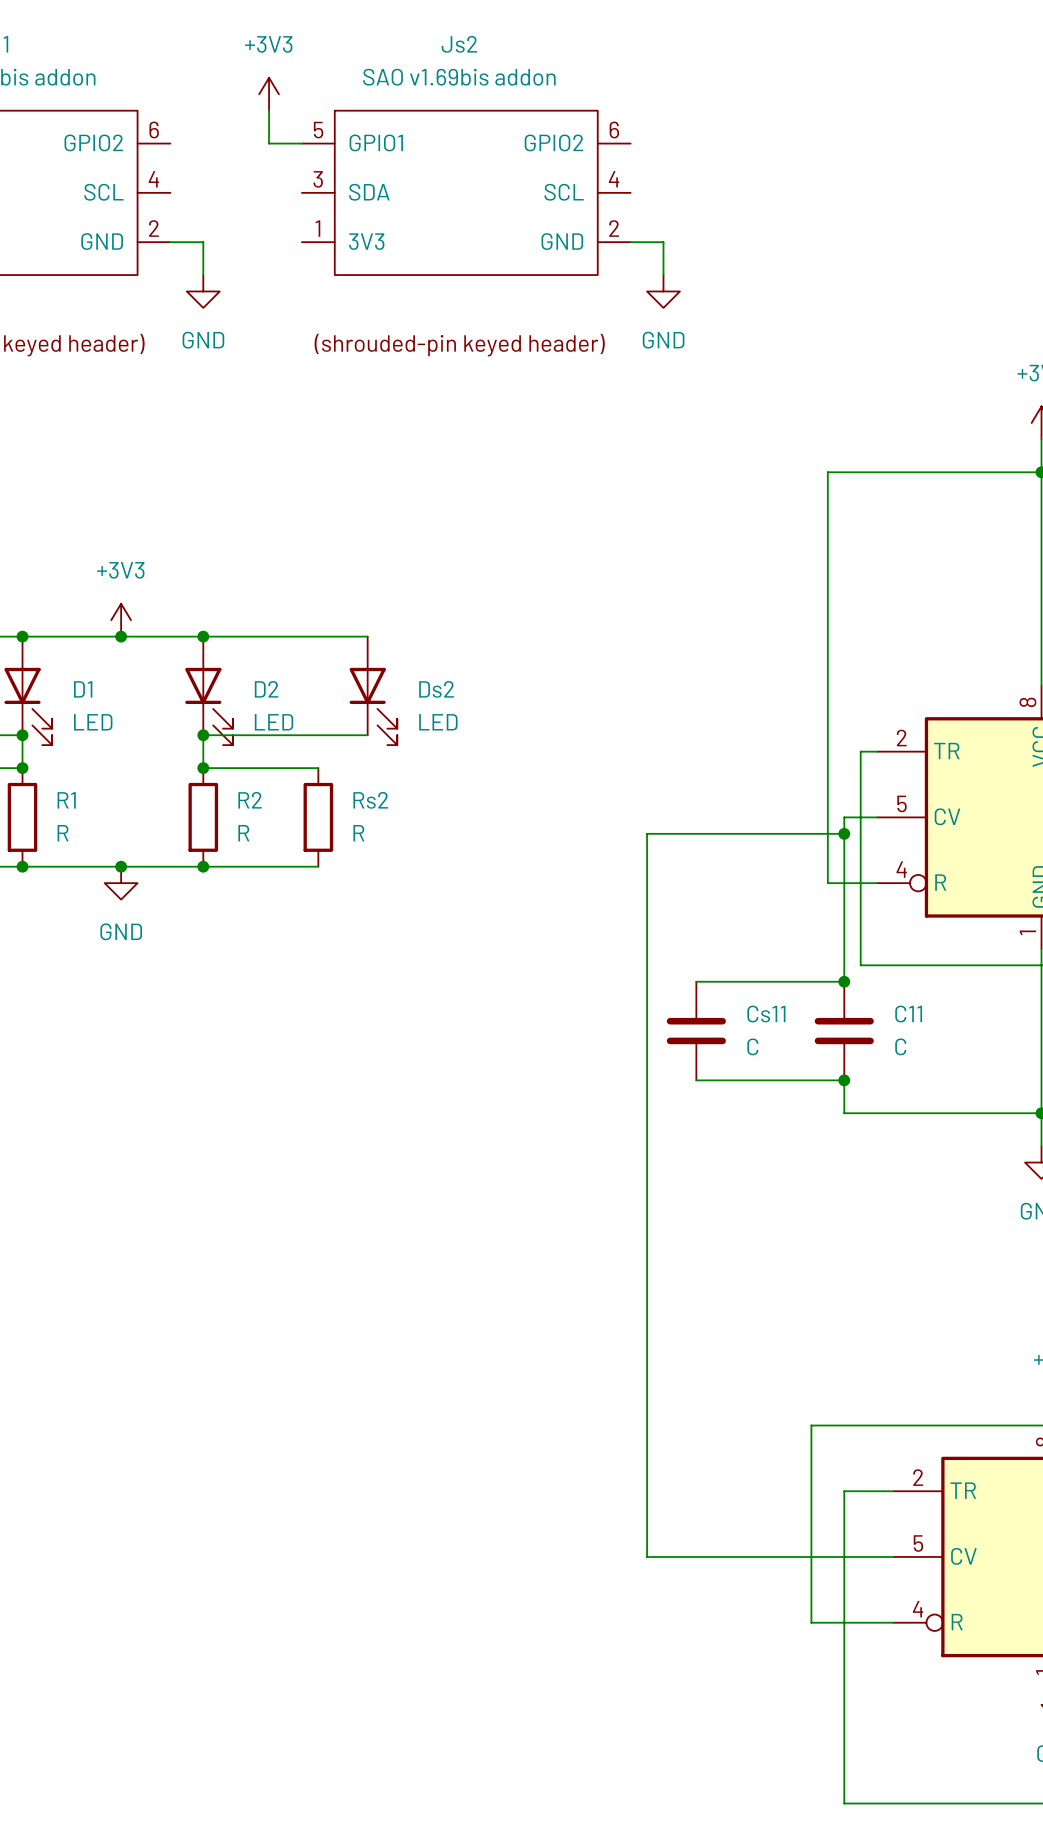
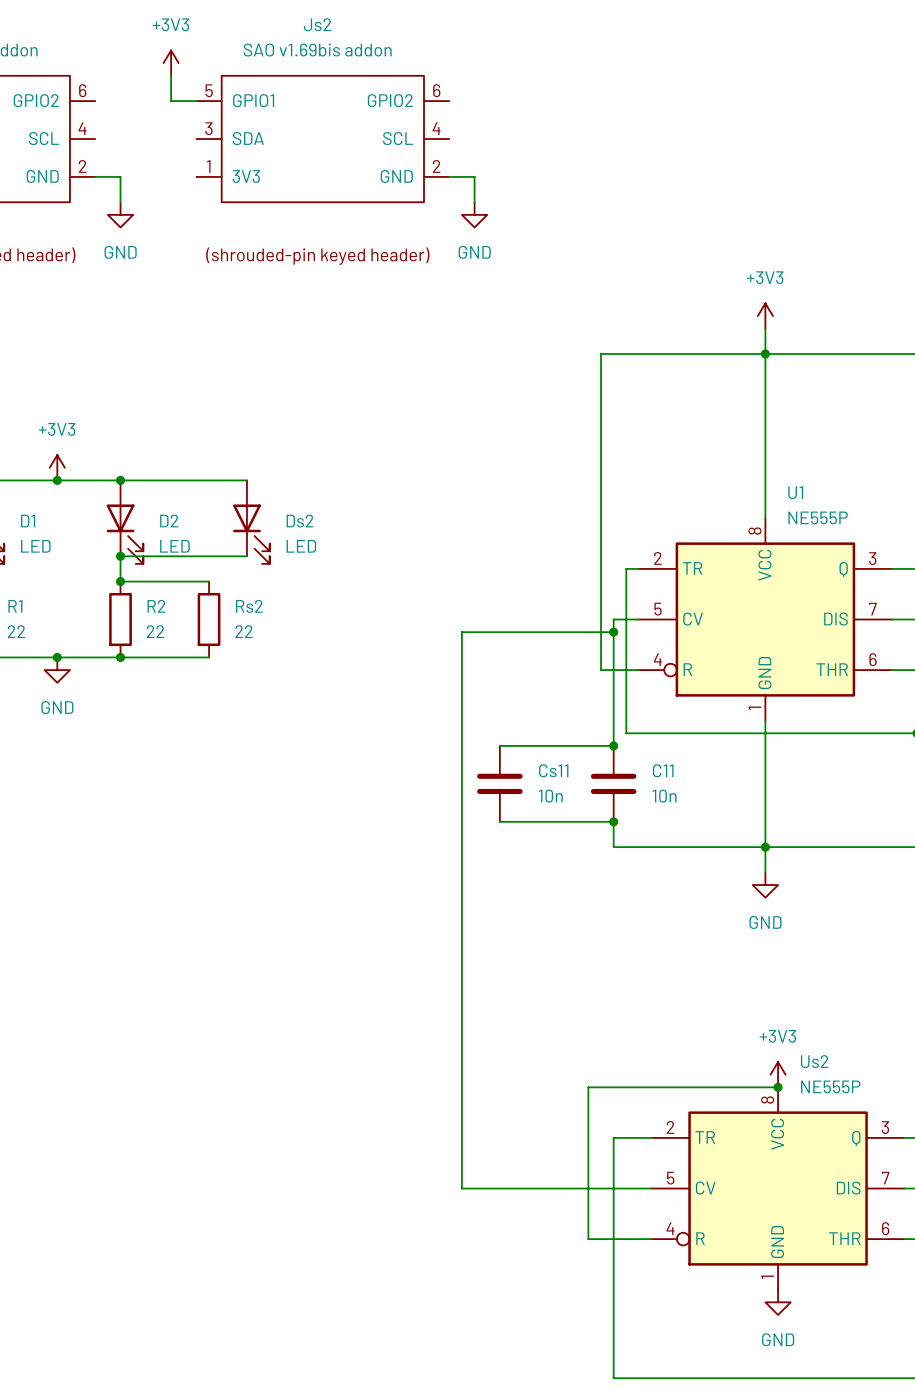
R1 value: R (63, 833) -> 22 (16, 631)
R2 value: R (243, 833) -> 22 (155, 631)
Rs2 value: R (358, 833) -> 22 (244, 631)
Cs11 value: C (752, 1046) -> 10n (550, 796)
C11 value: C (900, 1046) -> 10n (664, 796)

